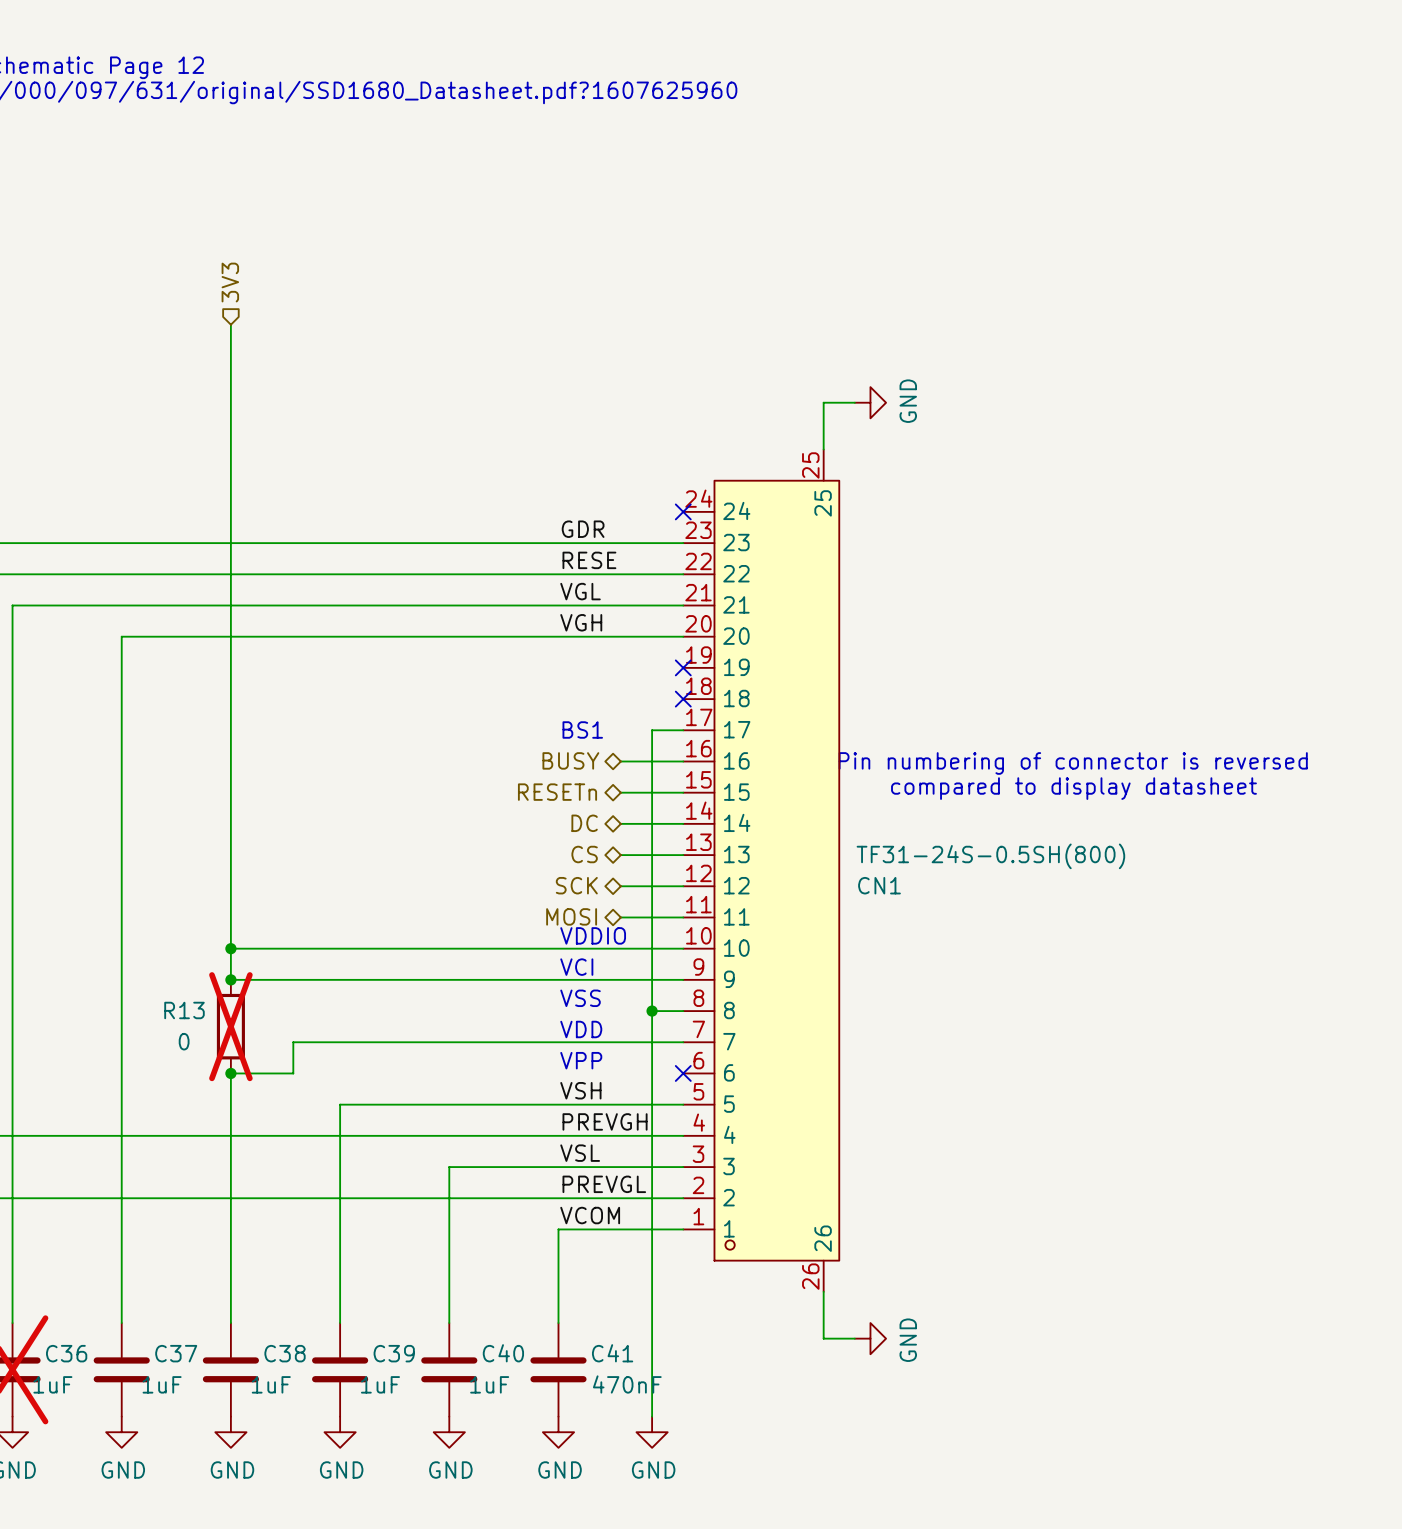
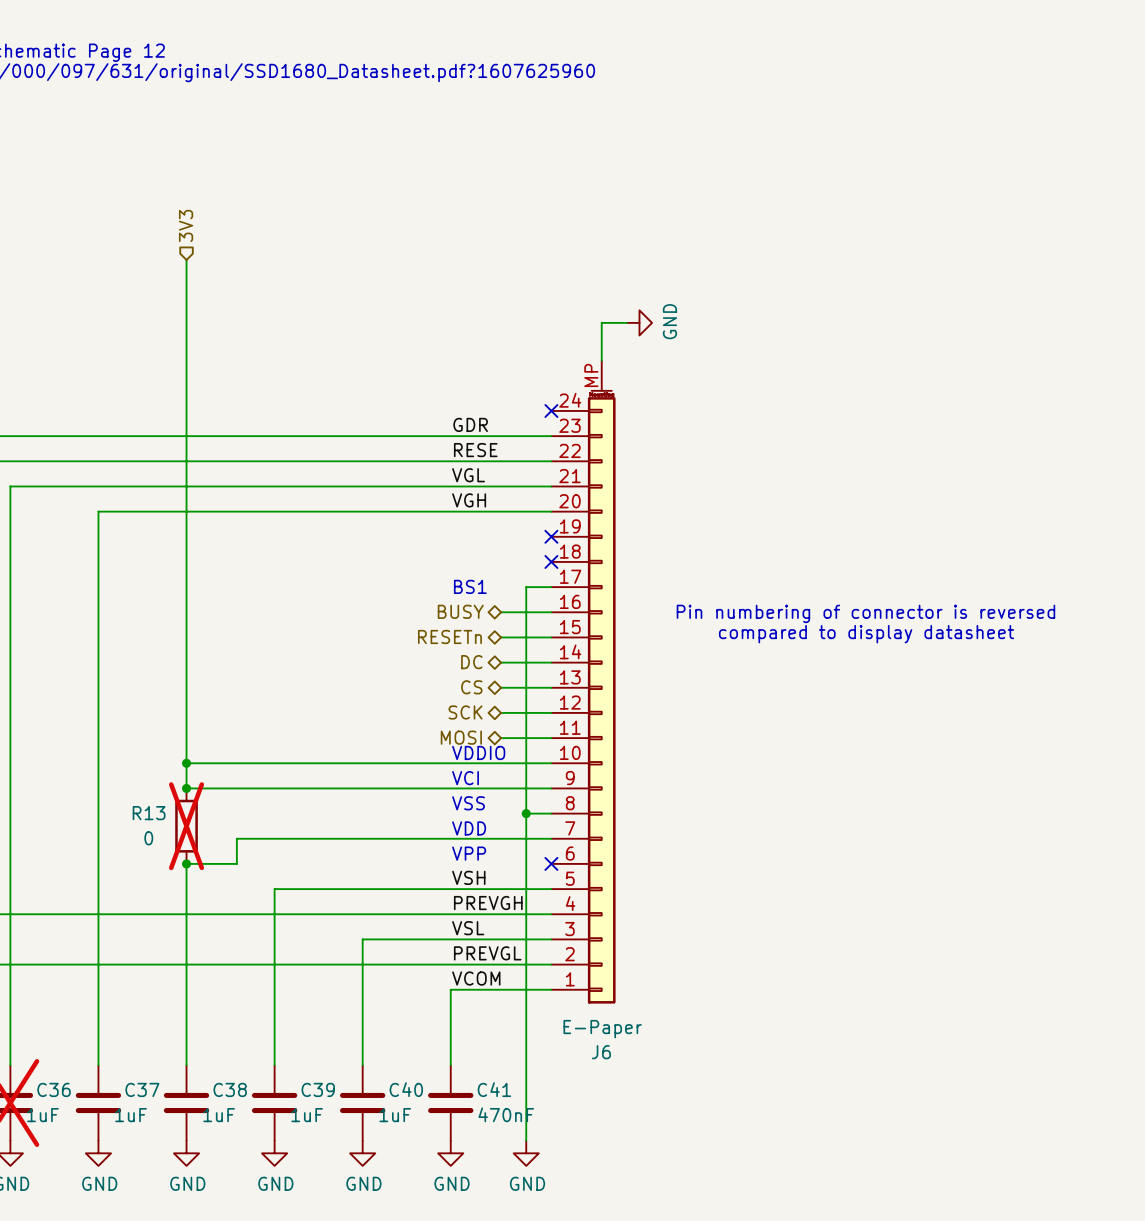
wire: (854, 402) (823, 402) (823, 449) -> (626, 322) (601, 322) (601, 360)
power symbol position: GND (870, 402) -> GND (639, 322)
J6: none -> E-Paper (583, 682)
CN1: TF31-24S-0.5SH(800) (761, 870) -> none
wire: (823, 1291) (823, 1338) (854, 1338) -> none
power symbol: GND (870, 1338) -> none

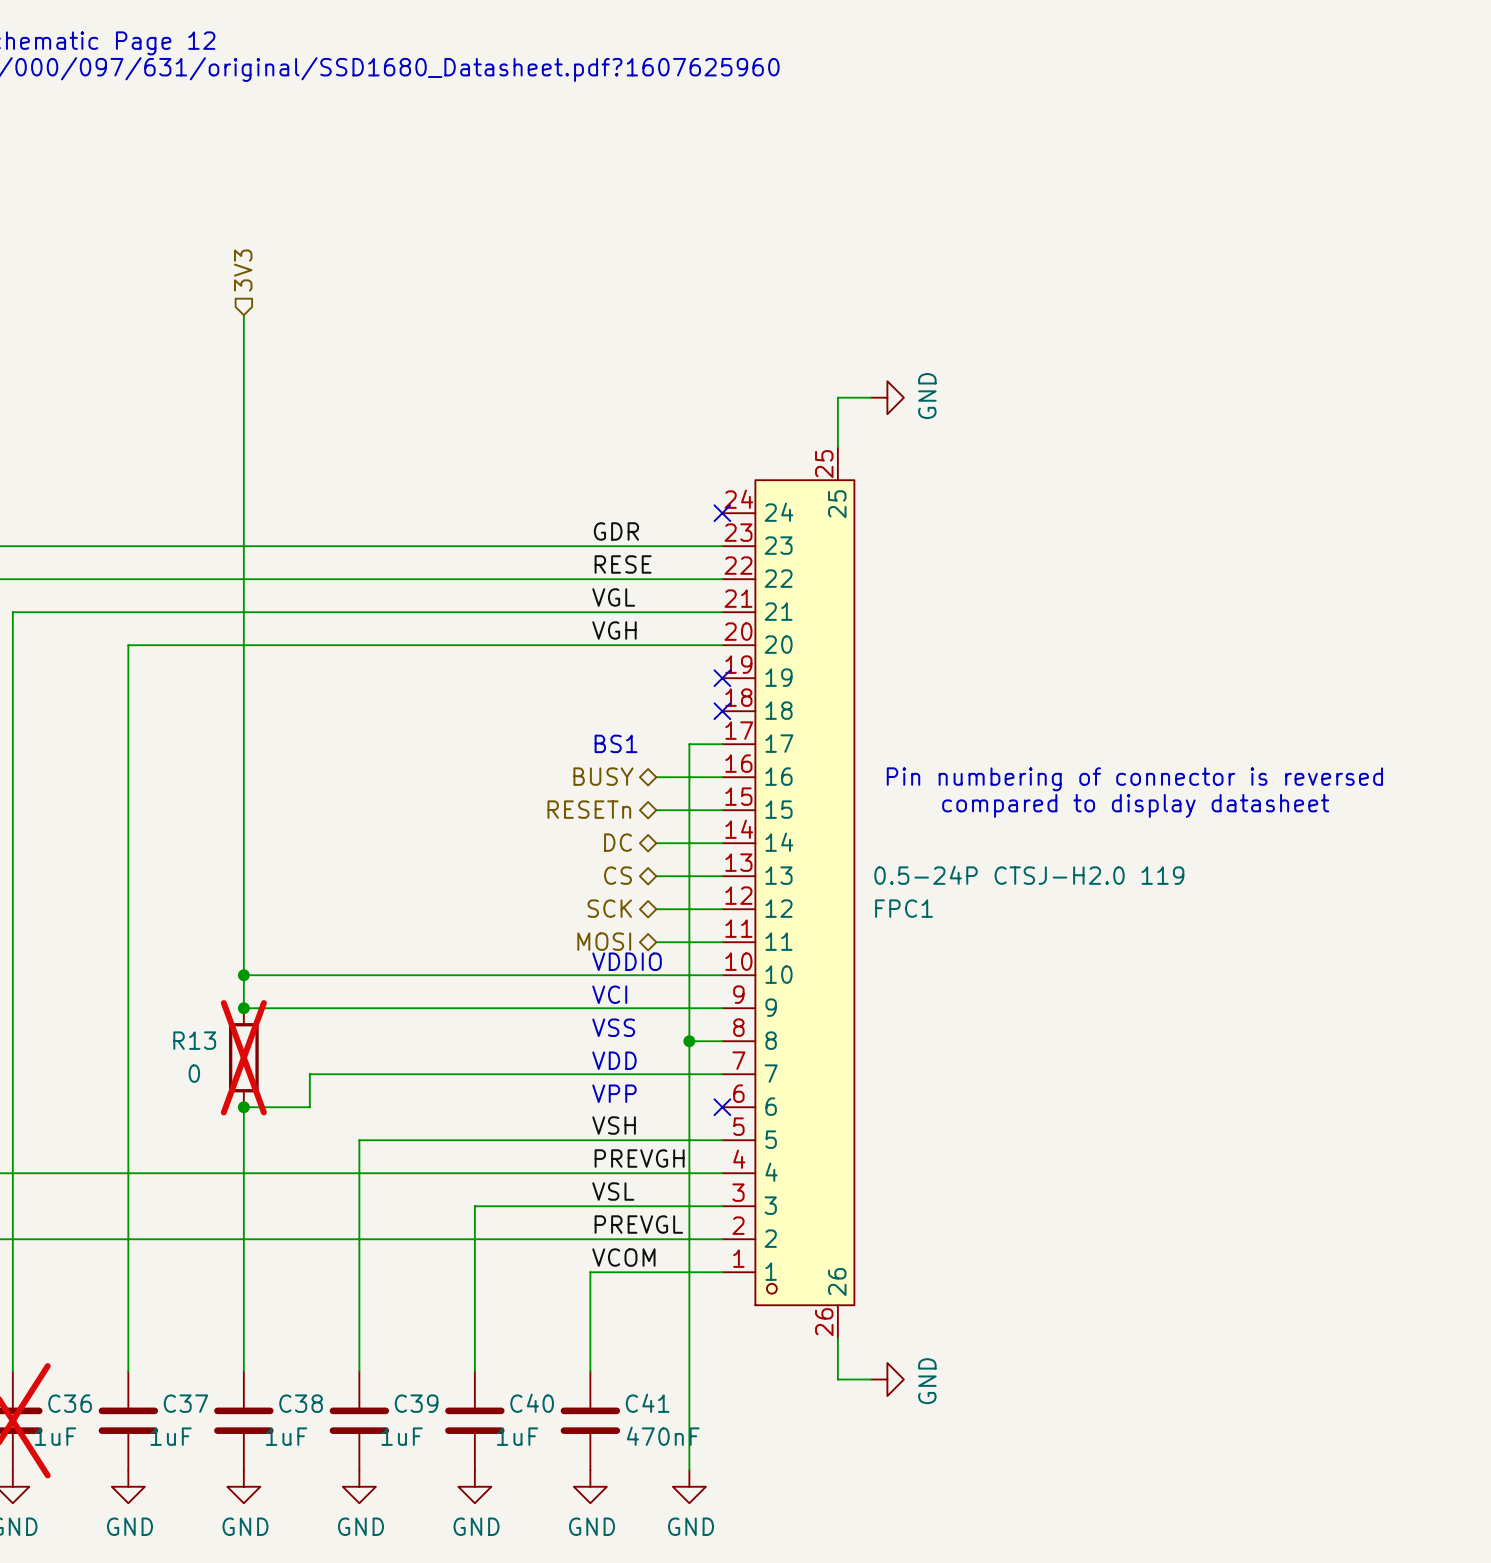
wire: (626, 322) (601, 322) (601, 360) -> (870, 397) (837, 397) (837, 447)
power symbol position: GND (639, 322) -> GND (887, 397)
J6: E-Paper (583, 682) -> none
FPC1: none -> 0.5-24P CTSJ-H2.0 119 (788, 892)
wire: none -> (837, 1338) (837, 1379) (870, 1379)
power symbol: none -> GND (887, 1379)

